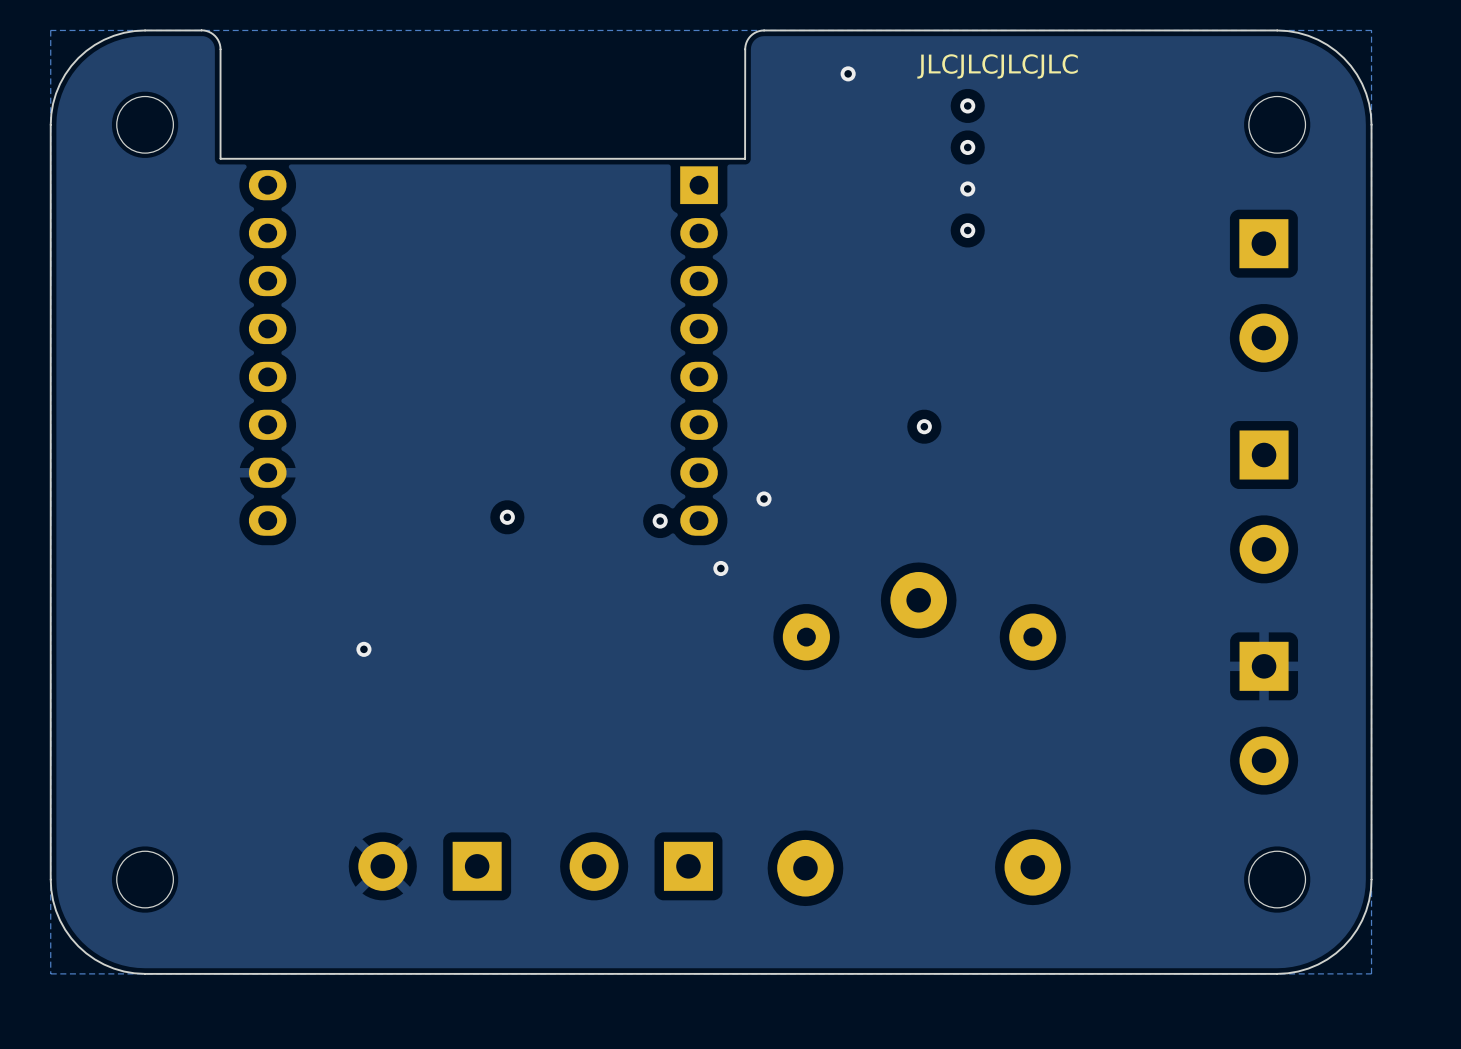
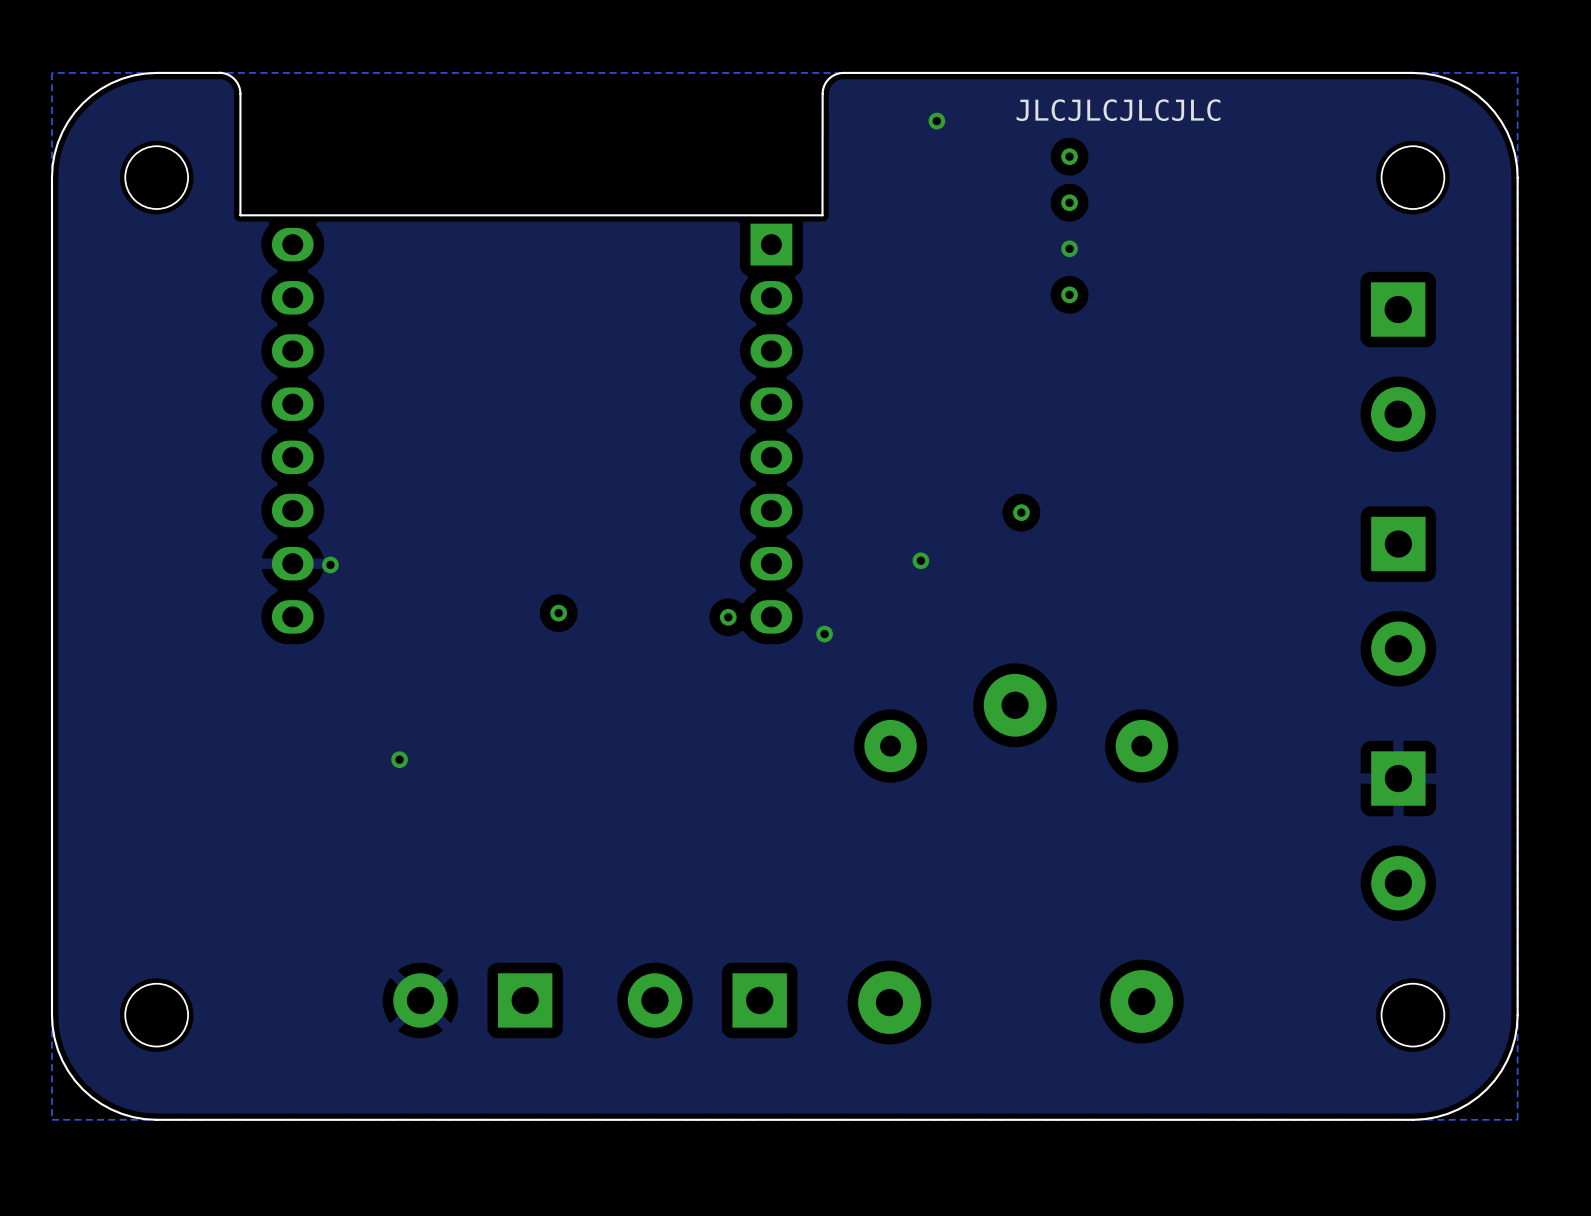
via: none -> (920, 560)
via: none -> (330, 564)
via: (764, 498) -> none
via: none -> (824, 634)
via: (720, 568) -> none

